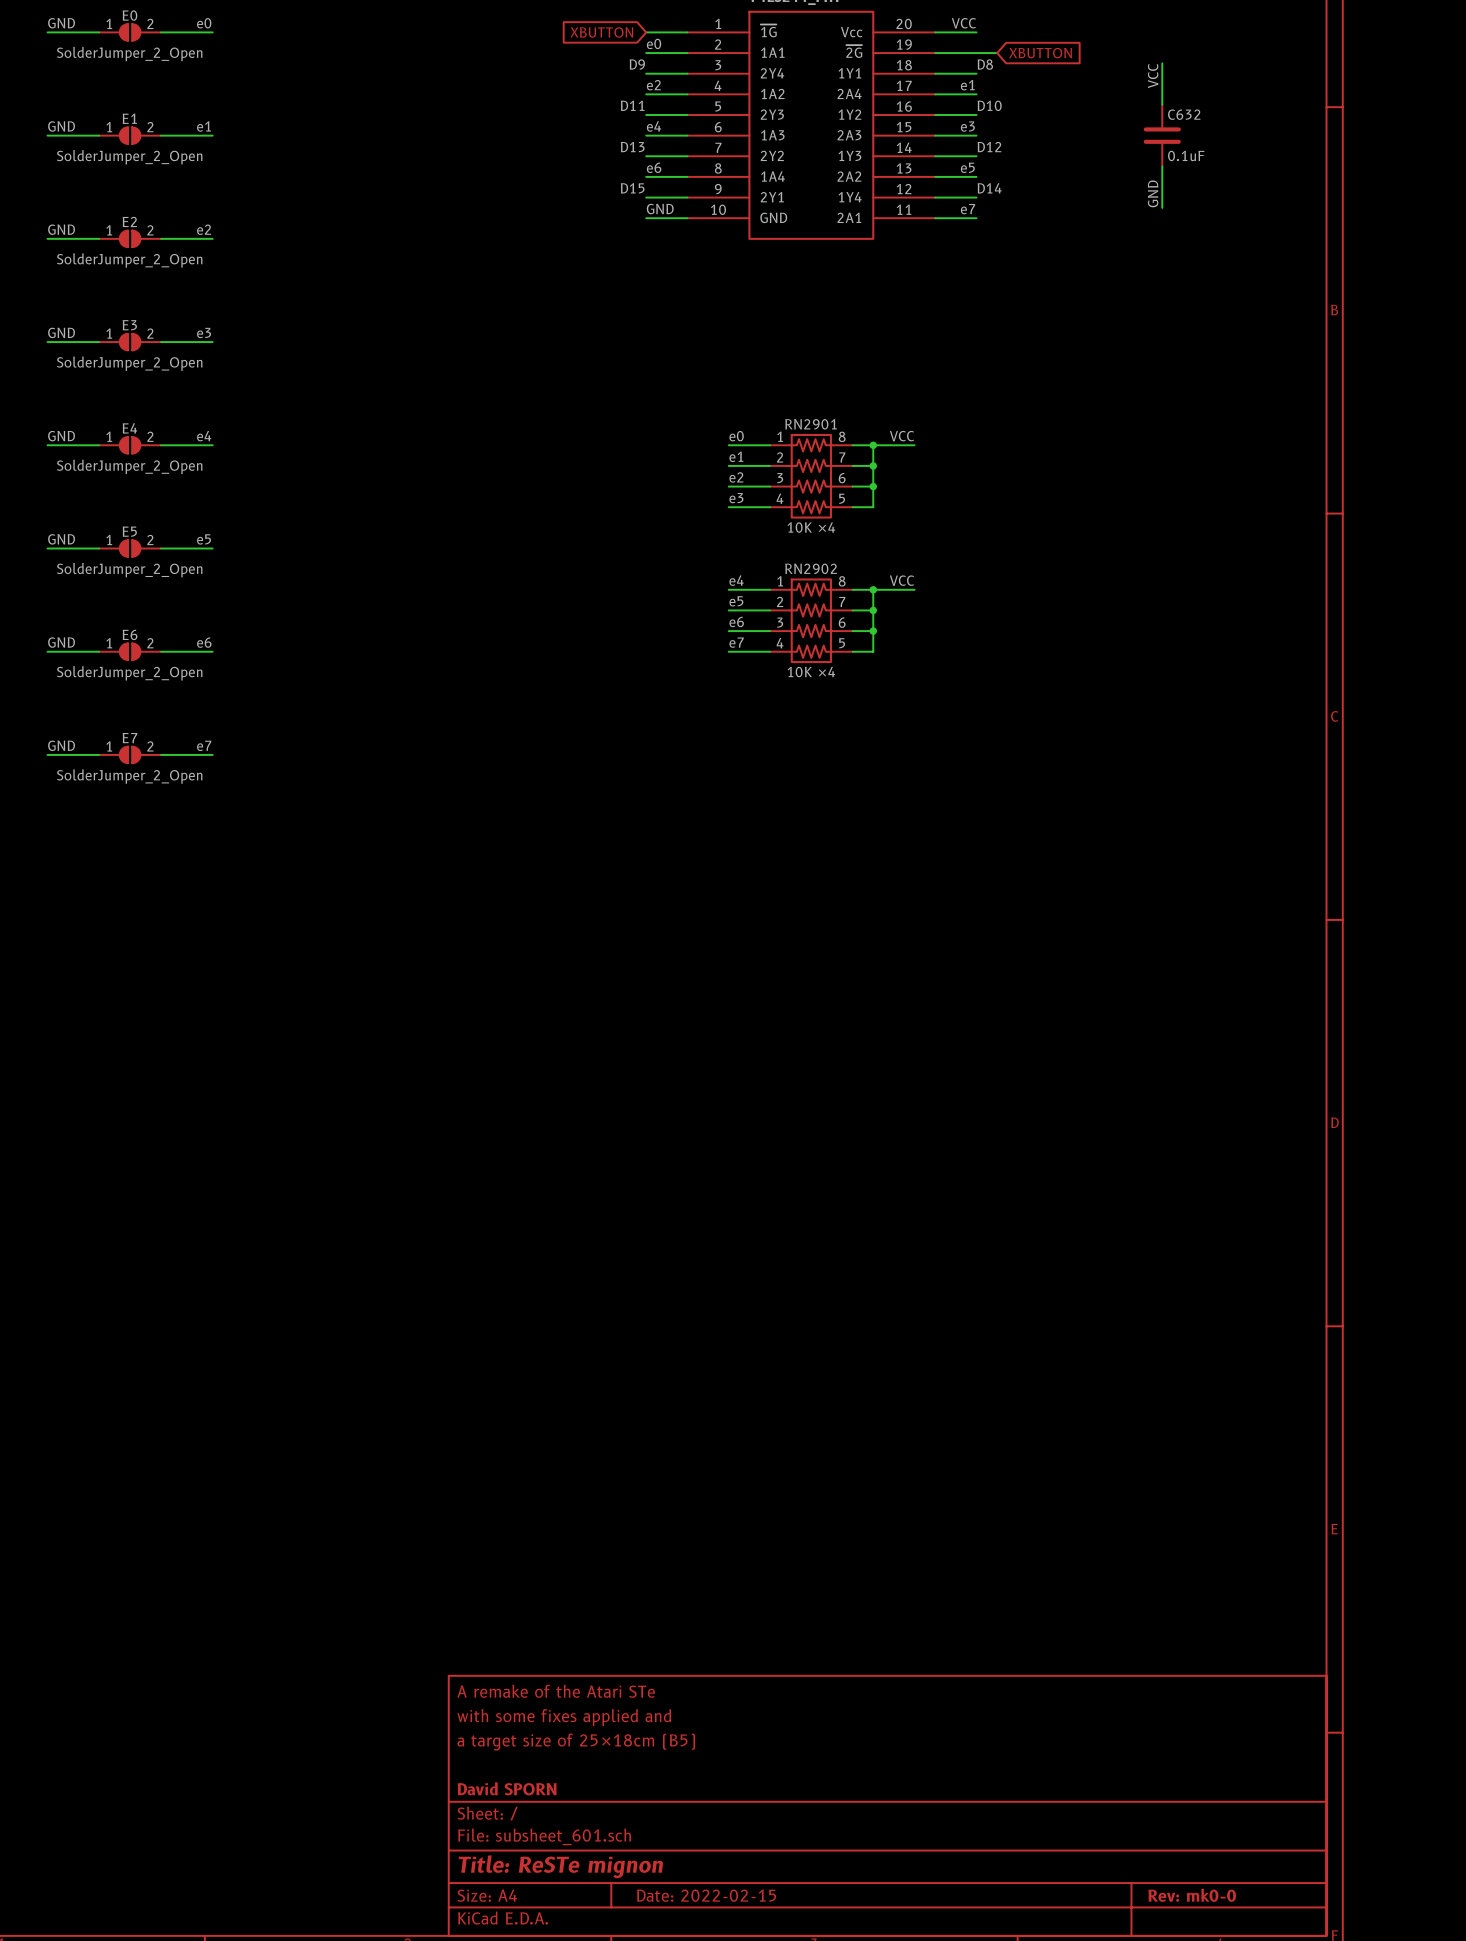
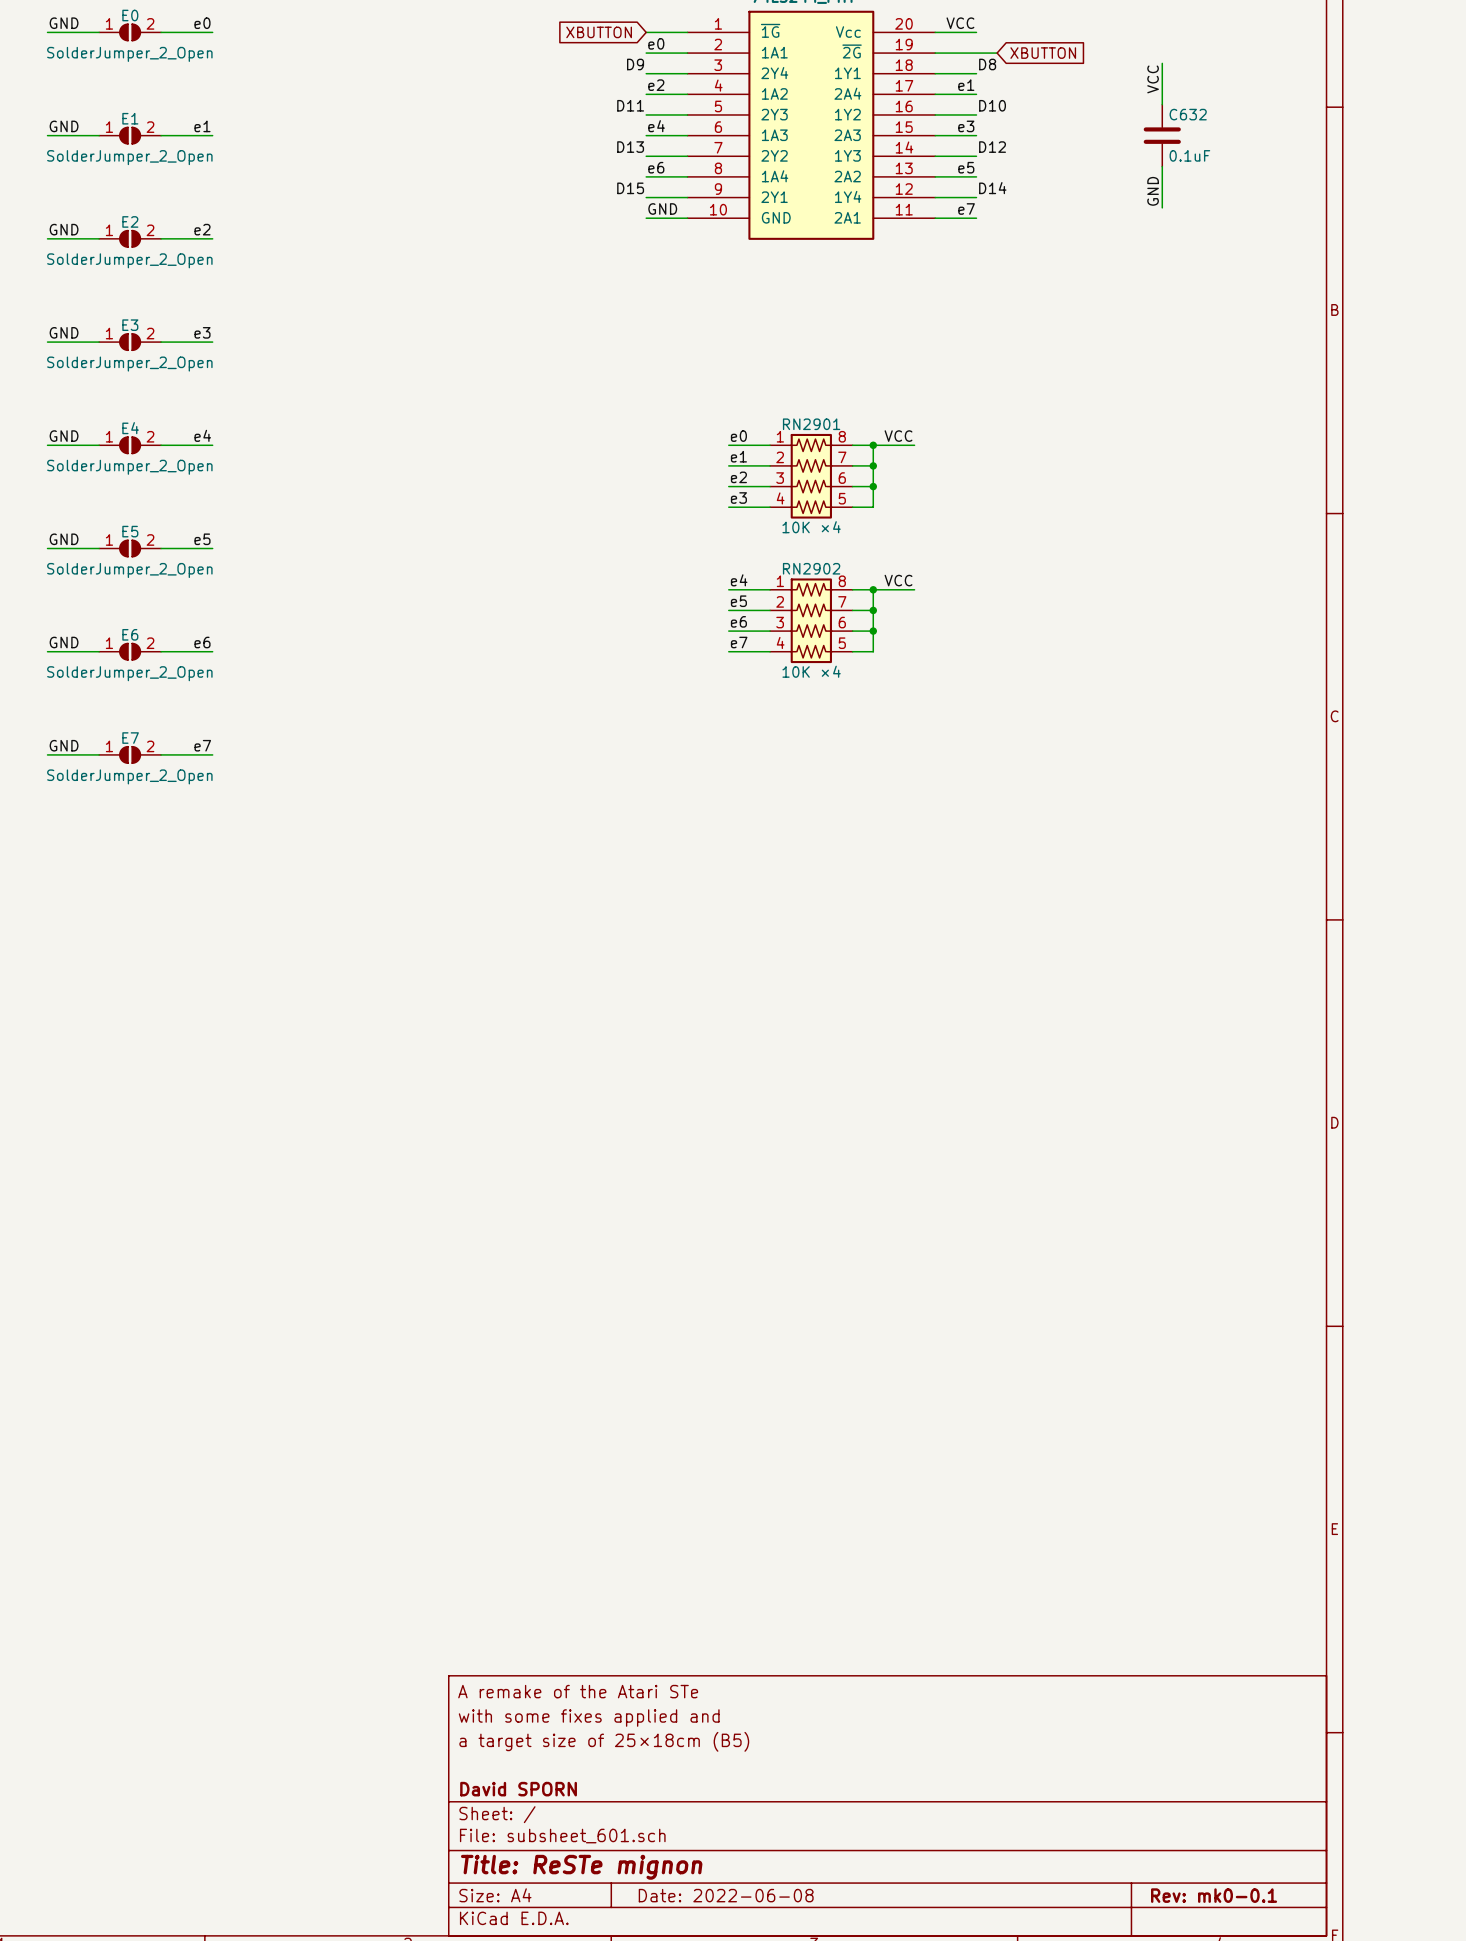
title block: Date: 2022-02-15 (706, 1895) -> Date: 2022-06-08 (726, 1895)
title block: Rev: mk0-0 (1192, 1895) -> Rev: mk0-0.1 (1214, 1895)

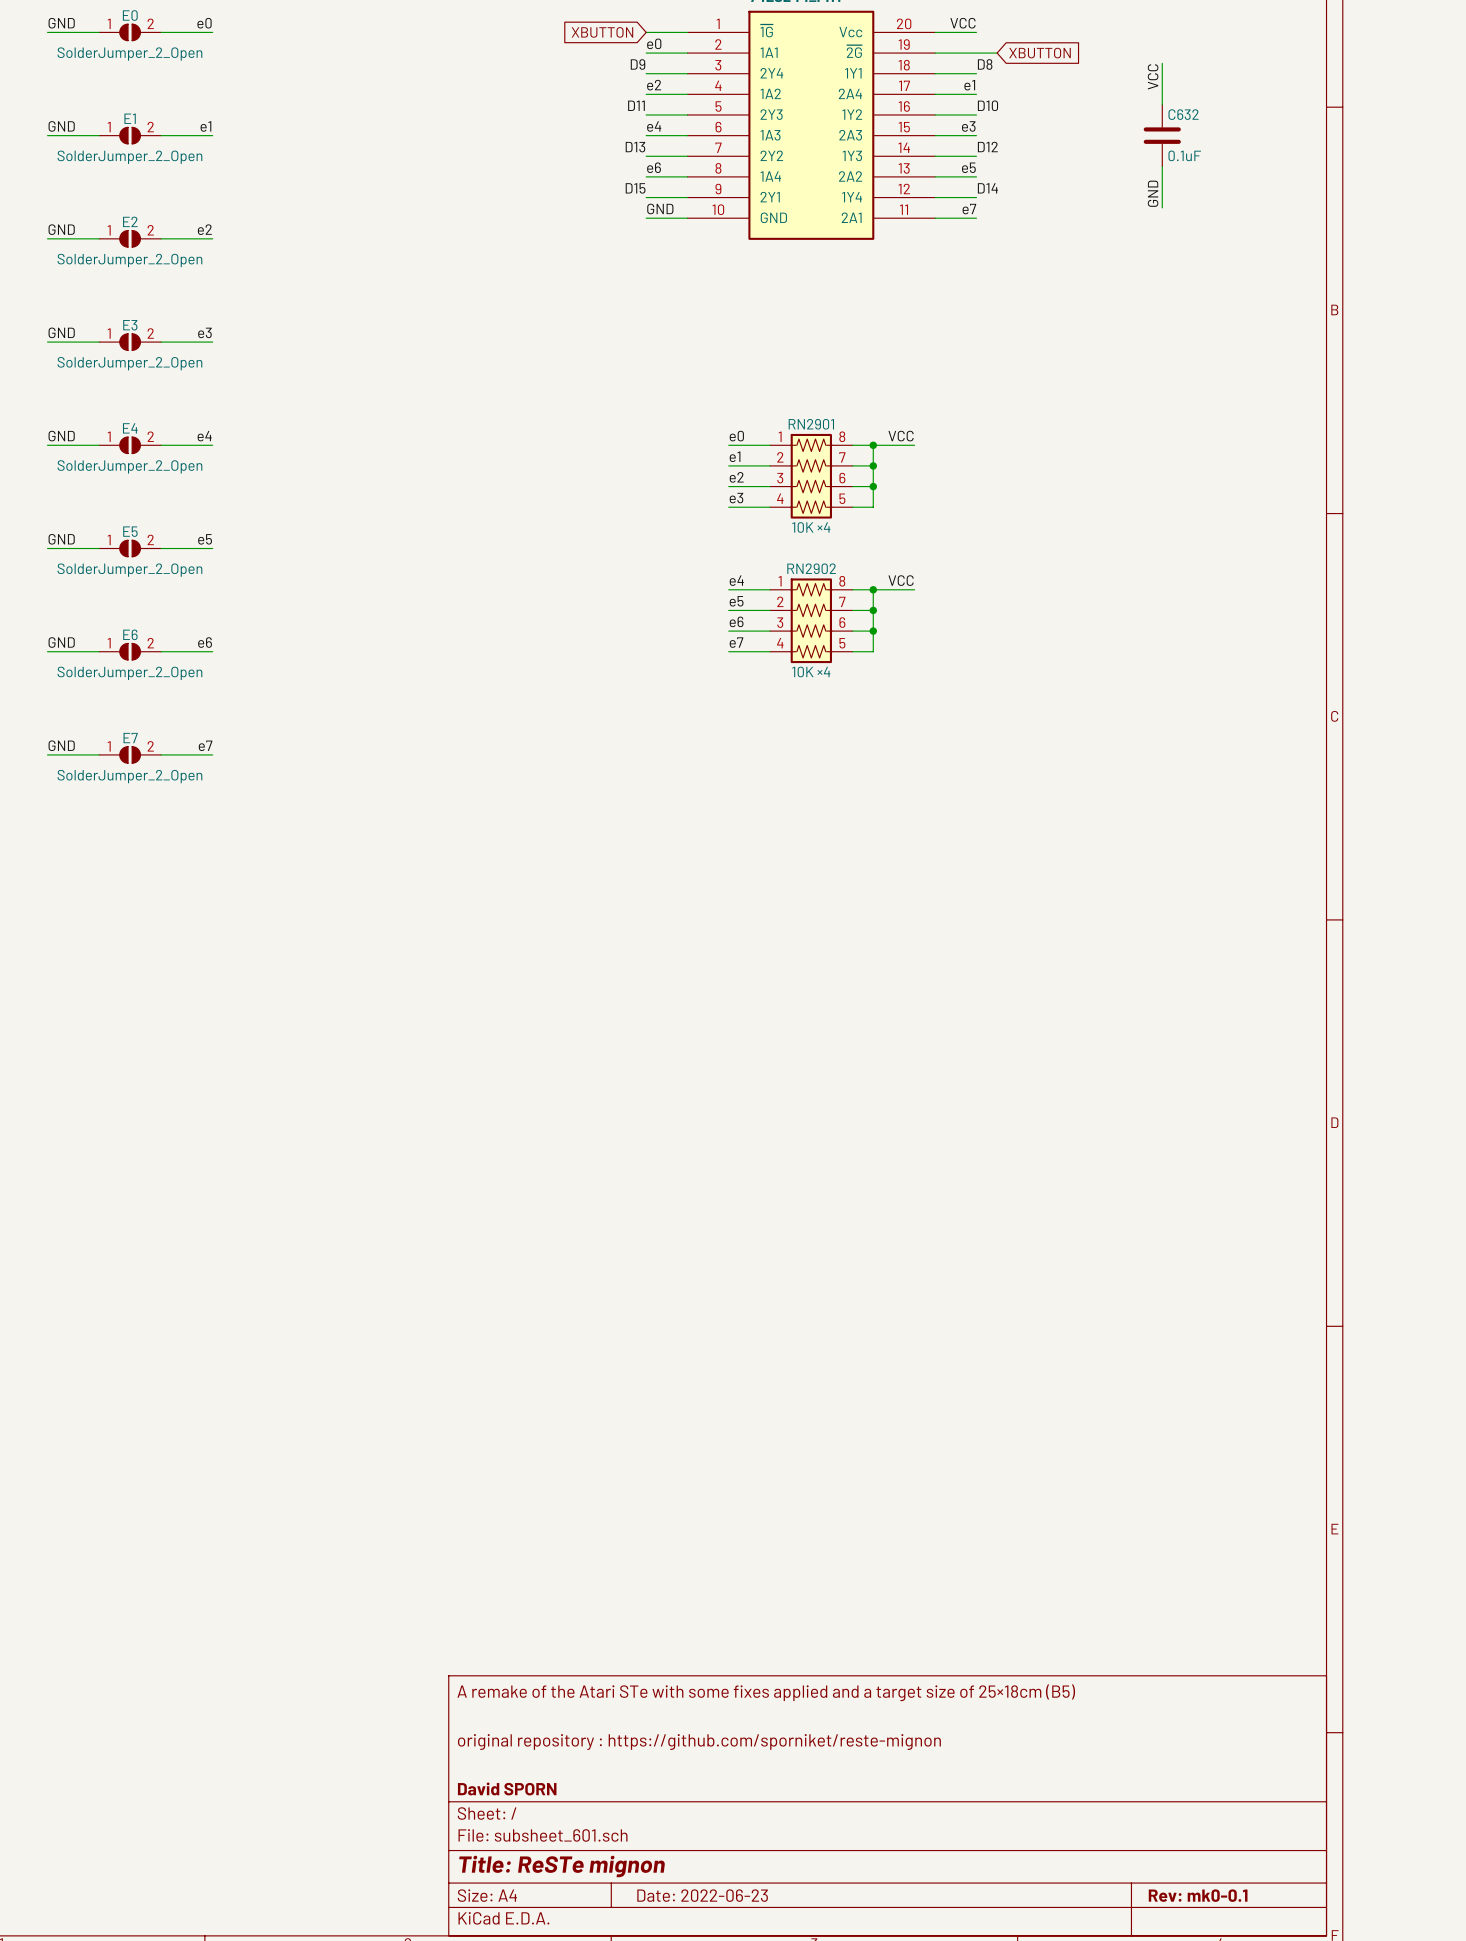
title block: A remake of the Atari STe (578, 1691) -> A remake of the Atari STe with some fixes applied and a target size of 25×18cm (B5) (766, 1692)
title block: with some fixes applied and (589, 1718) -> none
title block: a target size of 25×18cm (B5) (604, 1741) -> original repository : https://github.com/sporniket/reste-mignon (699, 1742)
title block: Date: 2022-06-08 (726, 1895) -> Date: 2022-06-23 (702, 1895)

